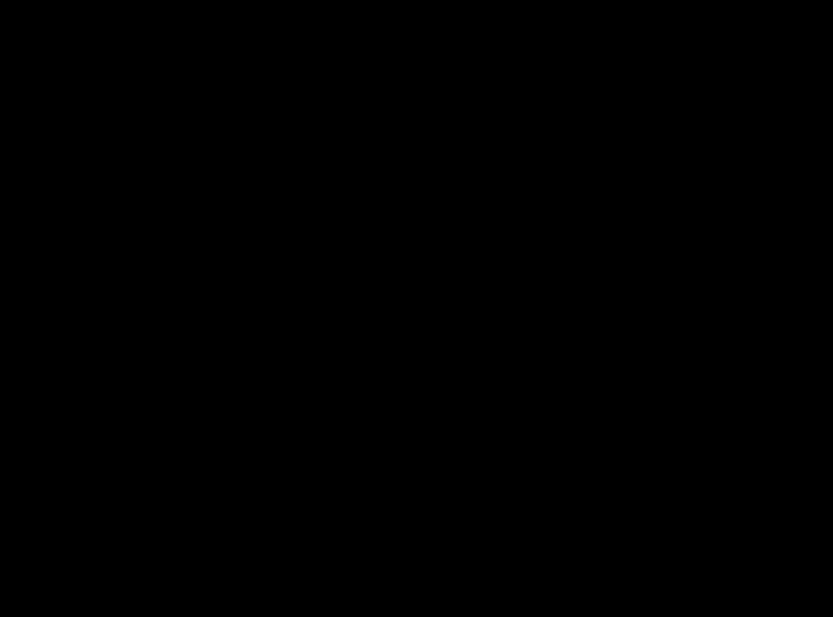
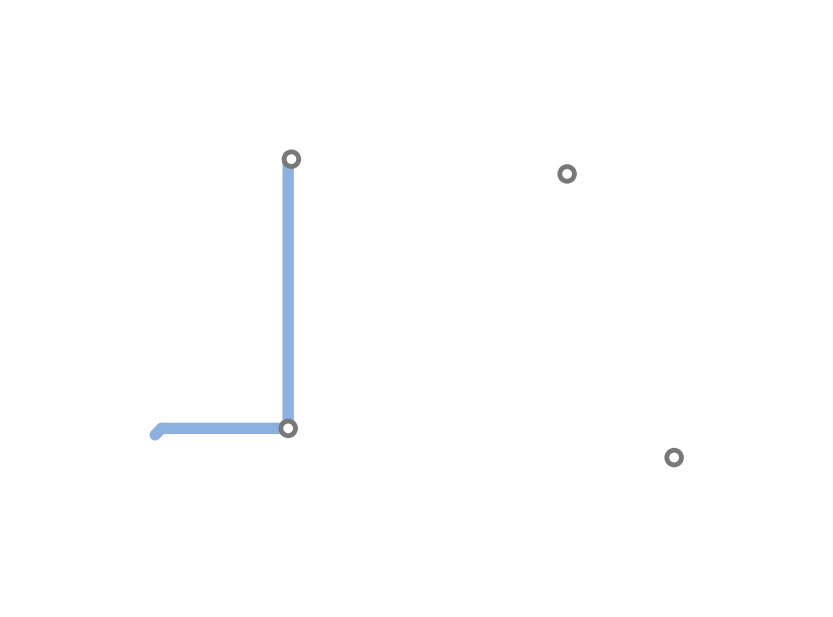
track: none -> (291, 159) (288, 162) (288, 428) (161, 428) (155, 434)
via: none -> (291, 159)
via: none -> (567, 173)
via: none -> (288, 428)
via: none -> (674, 457)

